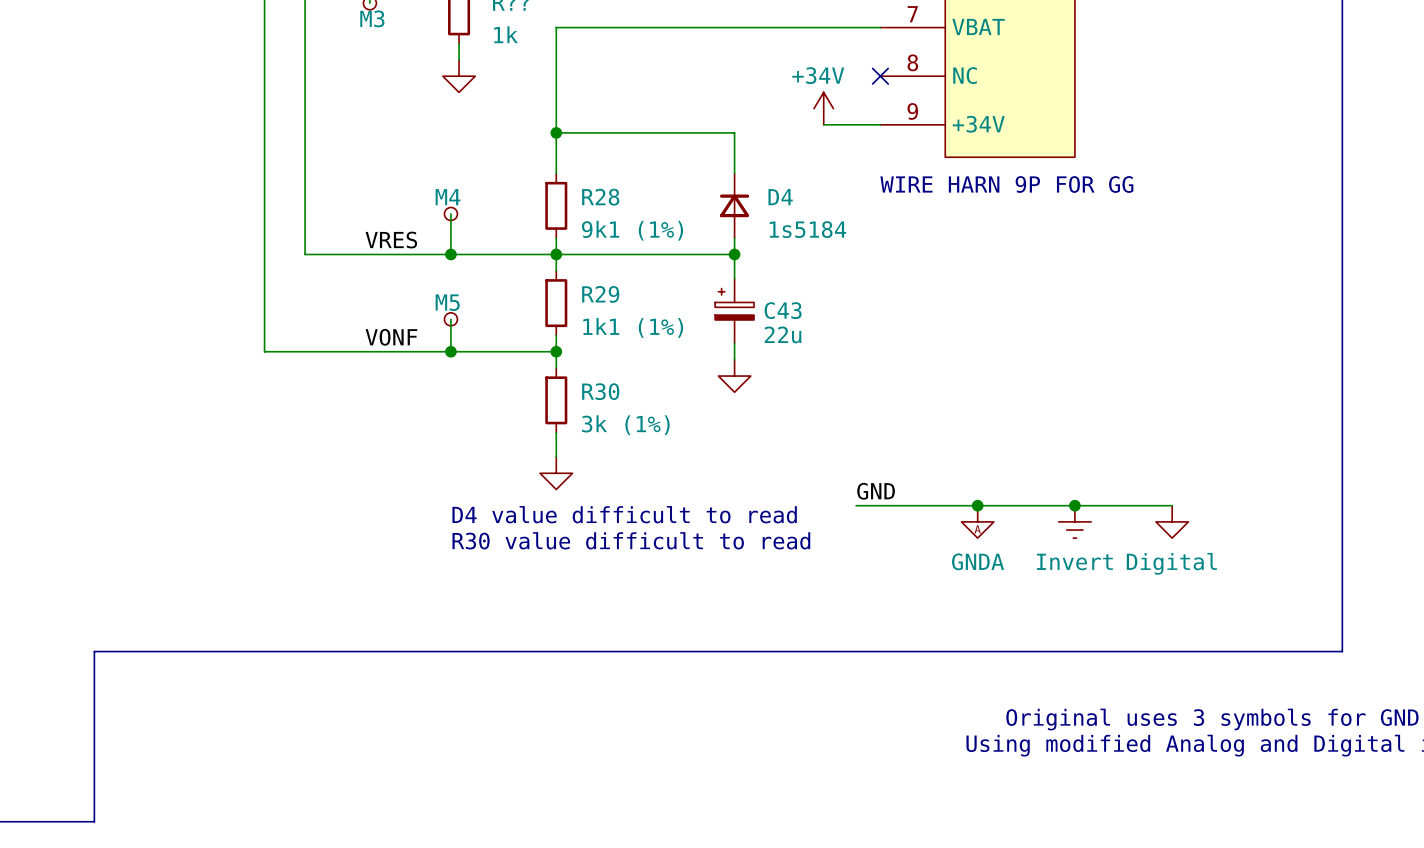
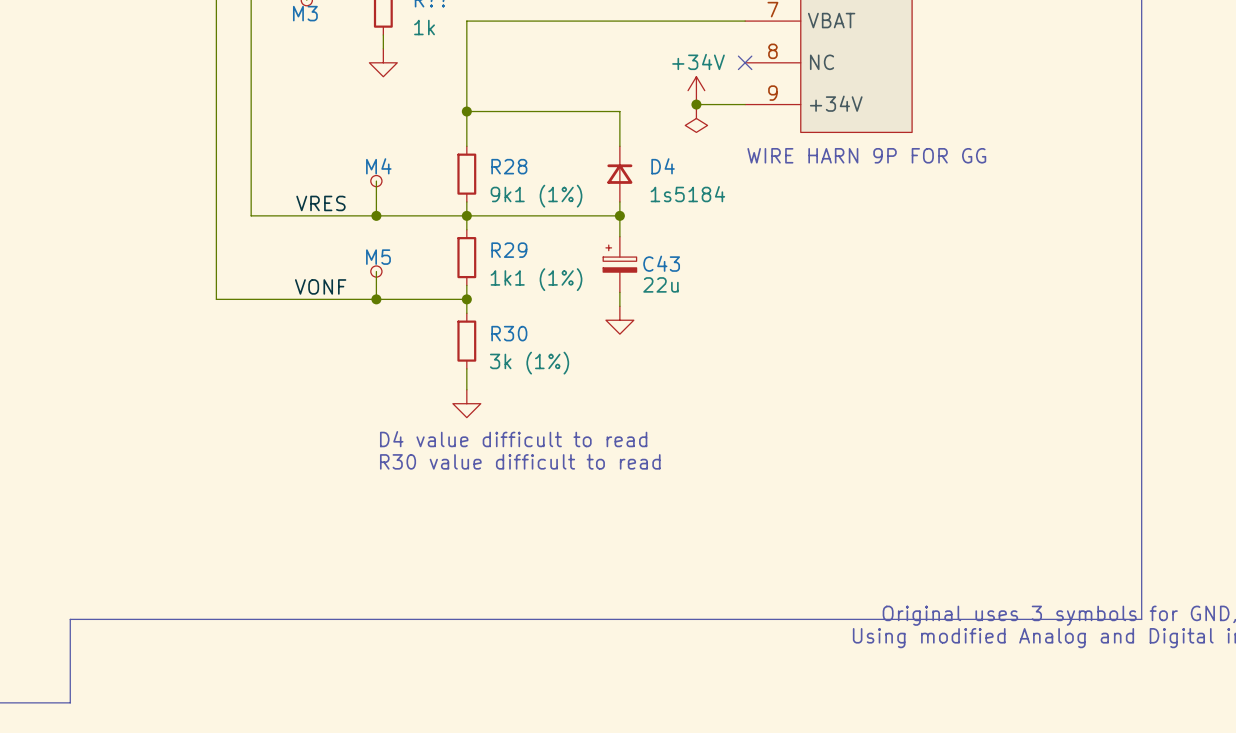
junction: none -> (696, 104)
power symbol: none -> (696, 118)
label: GND (876, 491) -> none
wire: (856, 505) (1172, 505) -> none
junction: (977, 505) -> none
junction: (1074, 505) -> none
power symbol: GNDA (977, 521) -> none
power symbol: Invert (1074, 521) -> none
power symbol: (1172, 521) -> none
bus: (1342, 651) (94, 651) (94, 724) -> (1141, 556) (1141, 619) (70, 619)

